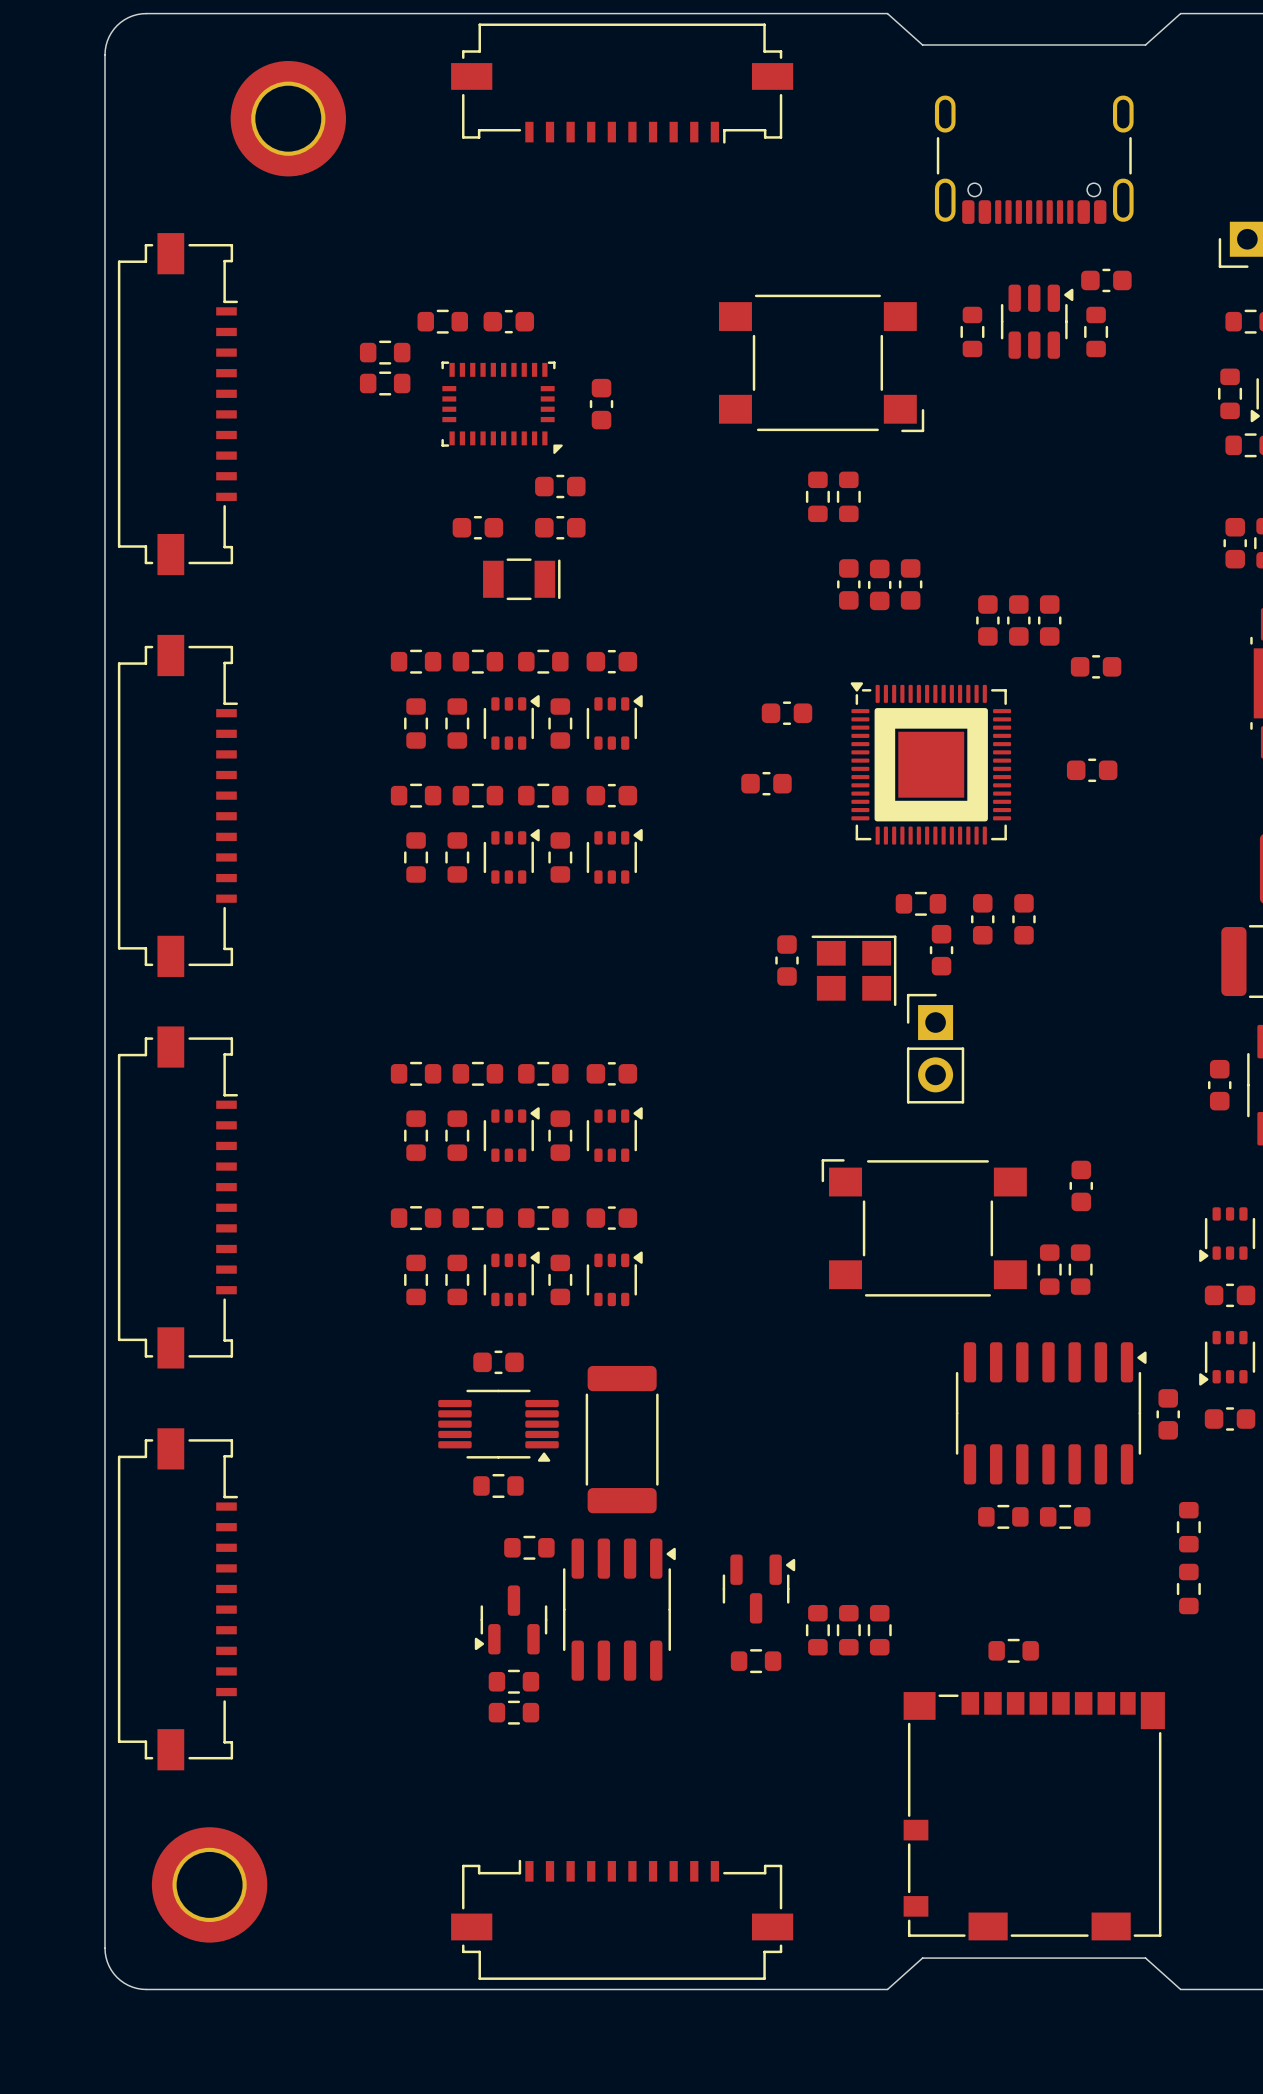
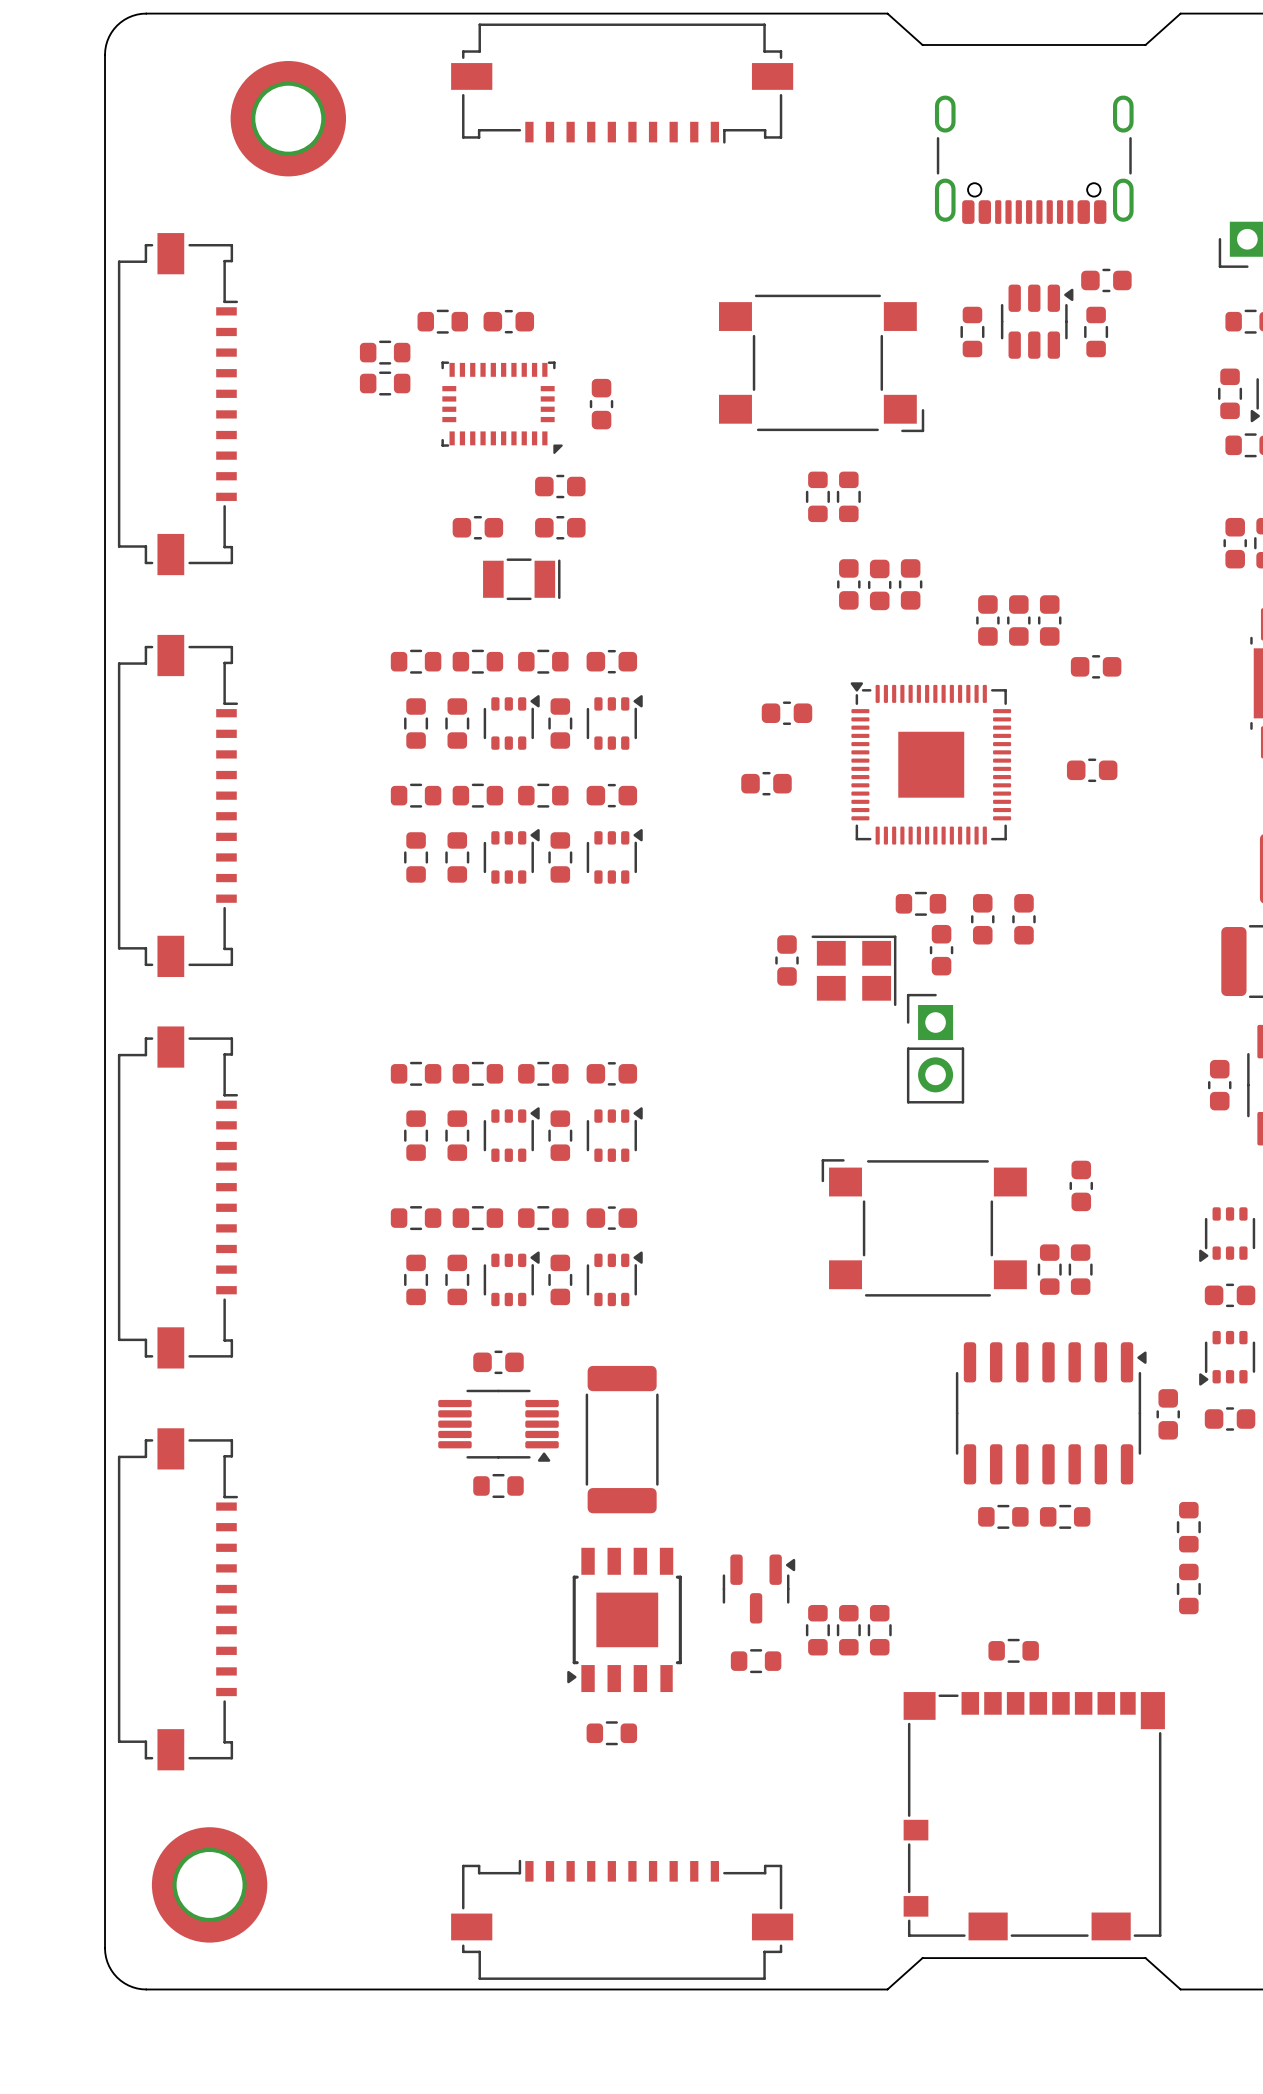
drawing: [874, 708, 988, 822] -> none
part footprint: [562, 1538, 676, 1681] -> [567, 1547, 682, 1693]
part: (529, 1547) -> none
part: (511, 1619) -> none
part: (513, 1681) -> none
part: (513, 1712) -> none
part: none -> (611, 1733)

